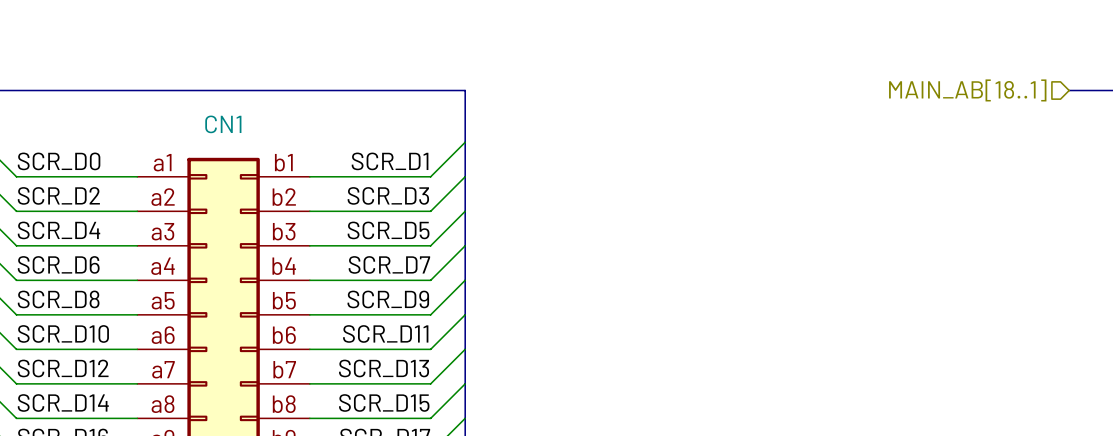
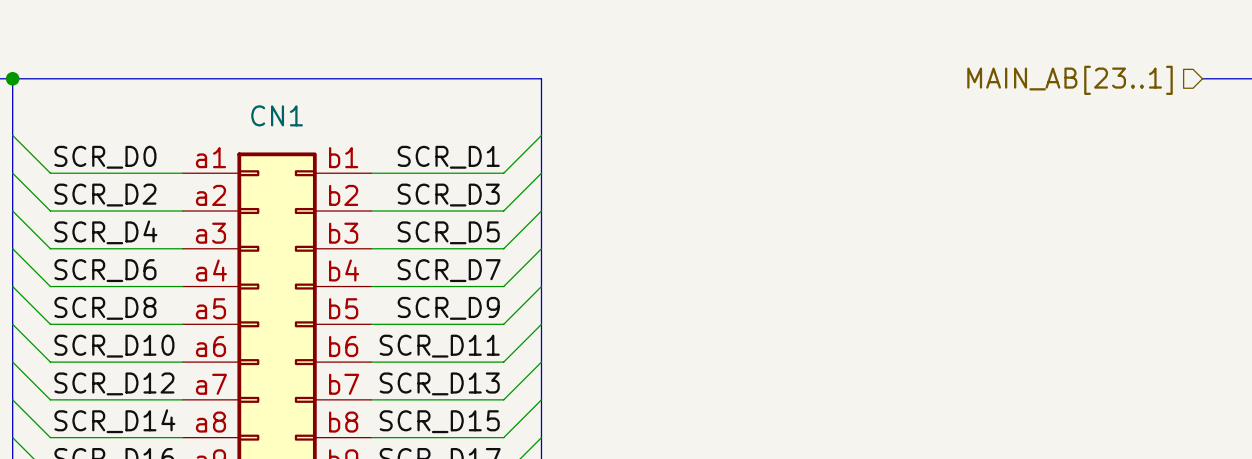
hierarchical label: MAIN_AB[18..1] (967, 90) -> MAIN_AB[23..1] (1070, 80)

